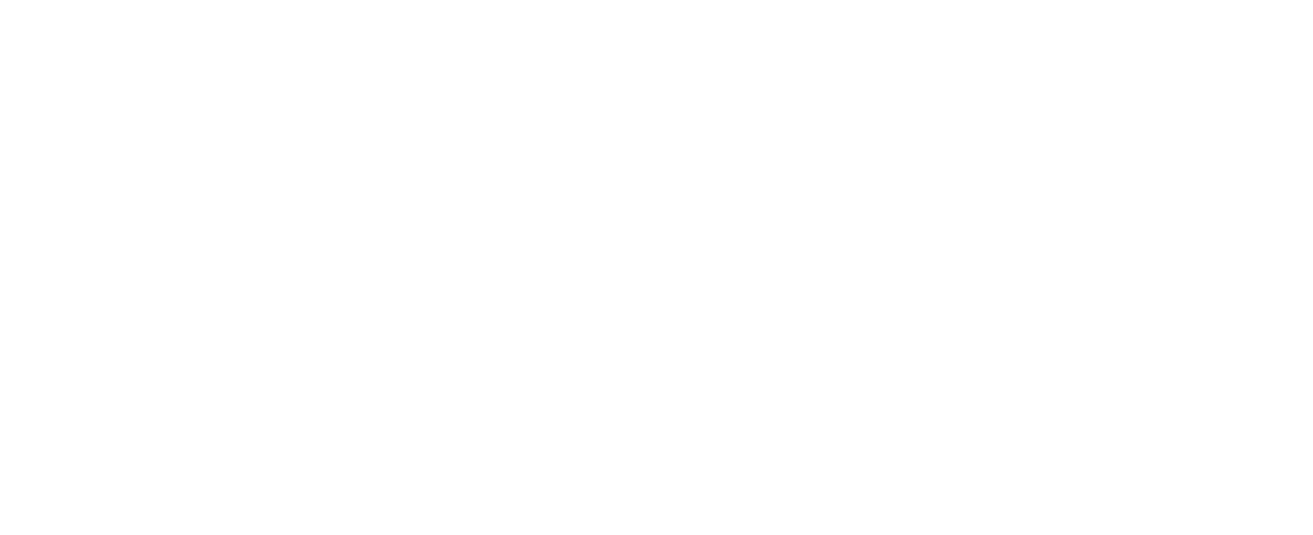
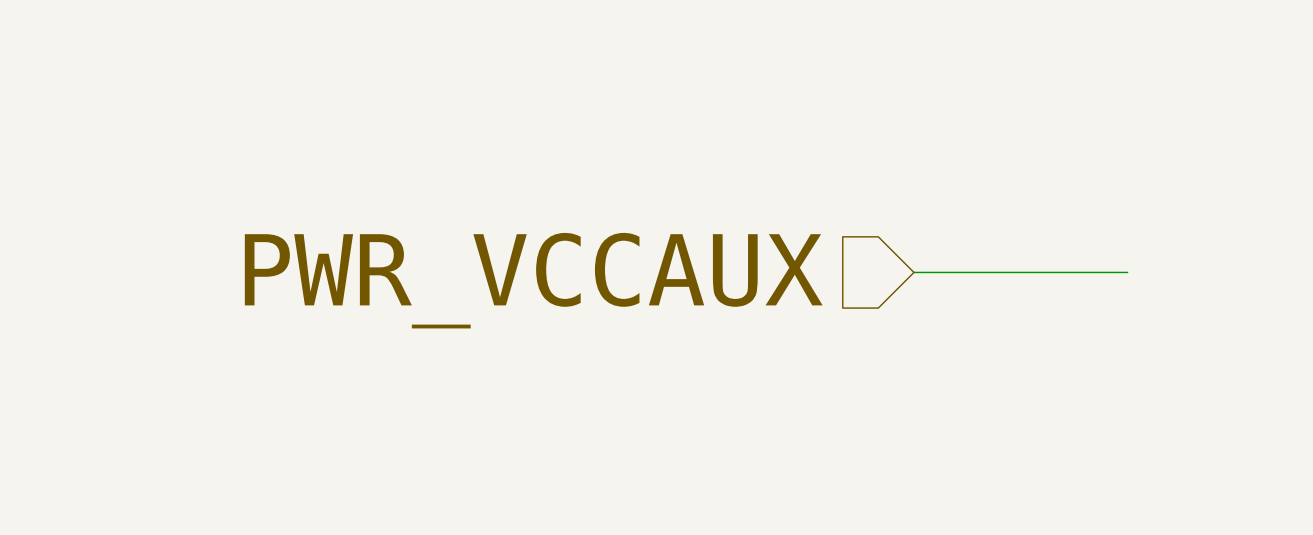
wire: none -> (913, 272) (1127, 272)
hierarchical label: none -> PWR_VCCAUX (533, 280)

